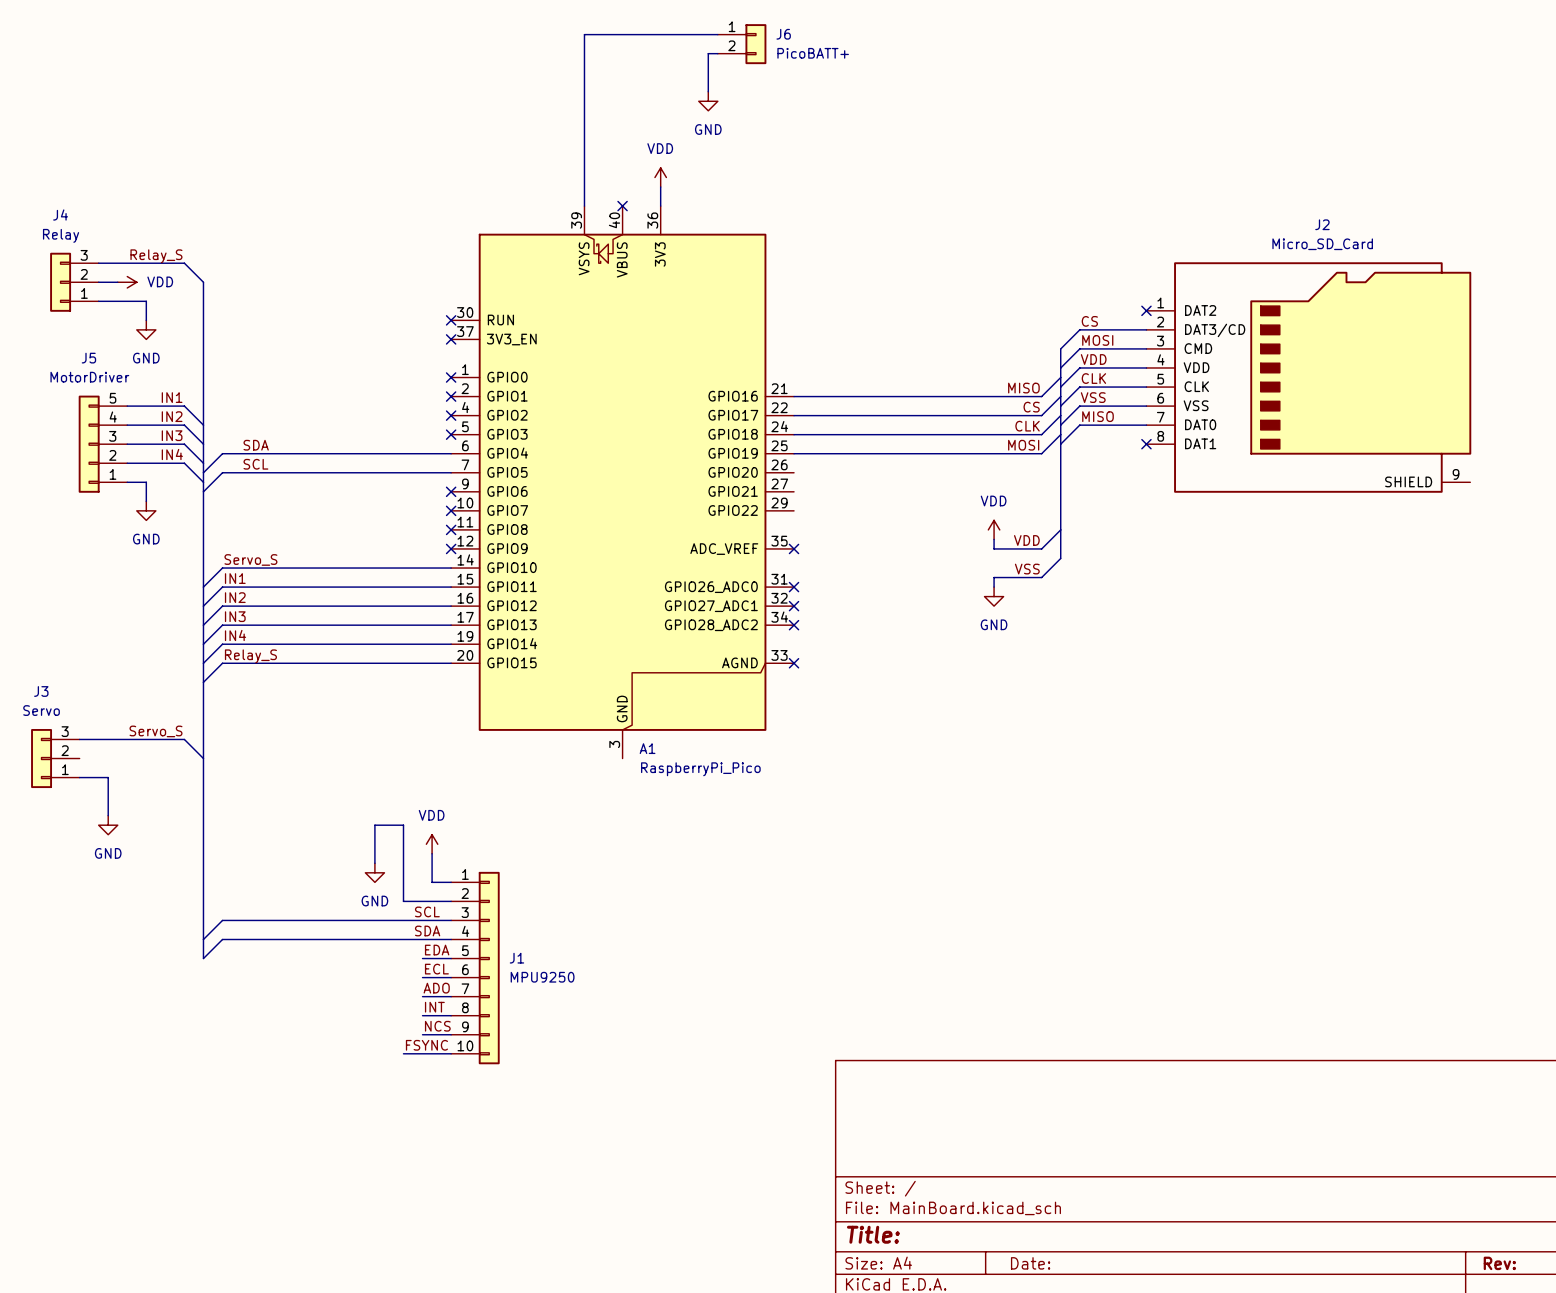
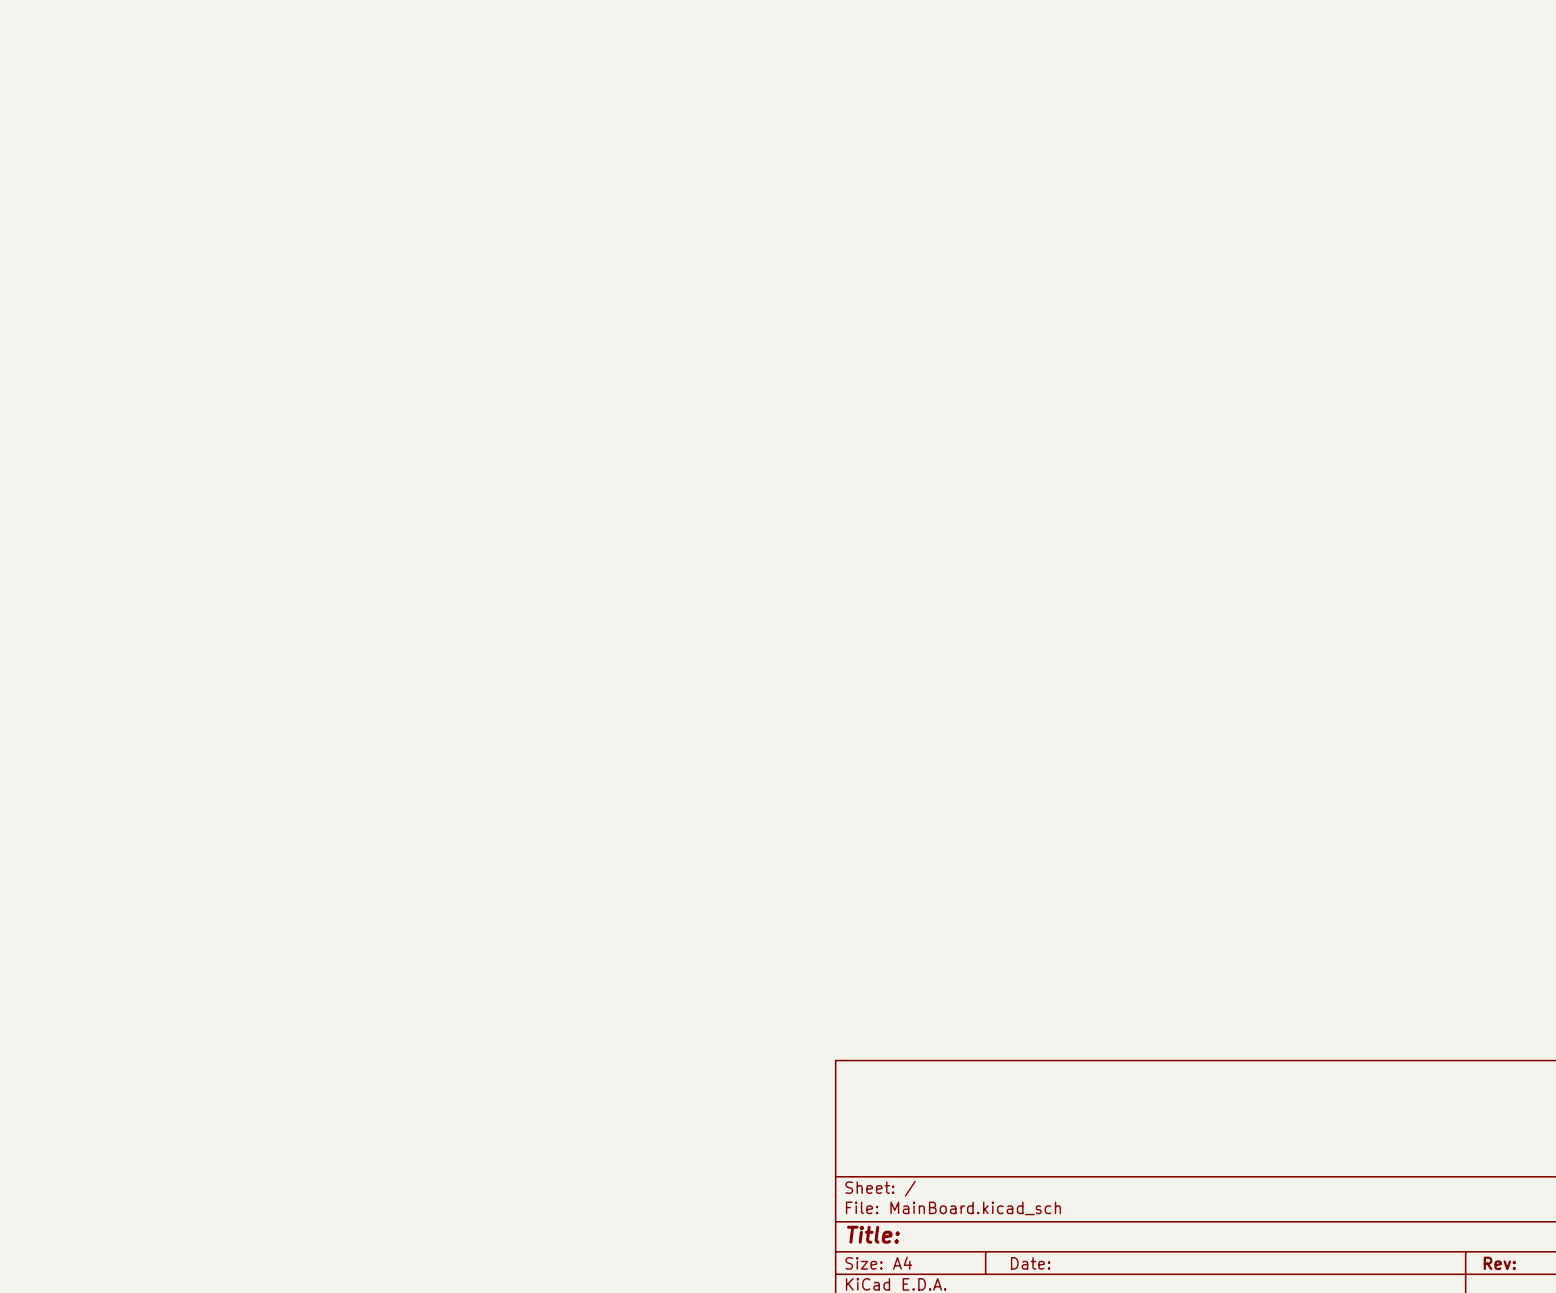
wire: (717, 34) (584, 34) (584, 206) -> none
J6: PicoBATT+ (742, 44) -> none
wire: (717, 53) (708, 53) (708, 91) -> none
power symbol: GND (708, 101) -> none
power symbol: VDD (660, 177) -> none
wire: (660, 187) (660, 206) -> none
no-connect mark: (622, 206) -> none
label: Relay_S (156, 256) -> none
wire: (98, 263) (184, 263) (203, 282) -> none
J4: Relay (74, 282) -> none
wire: (98, 282) (117, 282) -> none
power symbol: VDD (127, 282) -> none
bus: (203, 282) (203, 958) -> none
wire: (98, 301) (146, 301) (146, 320) -> none
no-connect mark: (1146, 310) -> none
no-connect mark: (451, 320) -> none
label: CS (1089, 321) -> none
power symbol: GND (146, 329) -> none
wire: (1146, 329) (1079, 329) (1060, 348) -> none
no-connect mark: (451, 339) -> none
label: MOSI (1097, 340) -> none
bus: (1060, 348) (1060, 558) -> none
wire: (1146, 348) (1079, 348) (1060, 367) -> none
label: VDD (1093, 359) -> none
wire: (1146, 367) (1079, 367) (1060, 387) -> none
no-connect mark: (451, 377) -> none
wire: (1060, 377) (1041, 396) (794, 396) -> none
J2: Micro_SD_Card (1308, 377) -> none
label: CLK (1093, 378) -> none
wire: (1146, 387) (1079, 387) (1060, 406) -> none
label: MISO (1023, 388) -> none
no-connect mark: (451, 396) -> none
wire: (1060, 396) (1041, 415) (794, 415) -> none
label: IN1 (172, 397) -> none
label: VSS (1093, 397) -> none
wire: (127, 406) (184, 406) (203, 425) -> none
wire: (1146, 406) (1079, 406) (1060, 425) -> none
label: CS (1031, 407) -> none
no-connect mark: (451, 415) -> none
wire: (1060, 415) (1041, 434) (794, 434) -> none
label: IN2 (172, 416) -> none
label: MISO (1097, 416) -> none
wire: (127, 425) (184, 425) (203, 444) -> none
wire: (1146, 425) (1079, 425) (1060, 444) -> none
label: CLK (1027, 426) -> none
no-connect mark: (451, 434) -> none
wire: (1060, 434) (1041, 453) (794, 453) -> none
label: IN3 (172, 435) -> none
J5: MotorDriver (102, 444) -> none
wire: (127, 444) (184, 444) (203, 463) -> none
no-connect mark: (1146, 444) -> none
label: SDA (256, 445) -> none
label: MOSI (1023, 445) -> none
wire: (451, 453) (222, 453) (203, 472) -> none
label: IN4 (172, 454) -> none
wire: (127, 463) (184, 463) (203, 482) -> none
label: SCL (255, 464) -> none
wire: (451, 472) (222, 472) (203, 491) -> none
wire: (127, 482) (146, 482) (146, 501) -> none
A1: RaspberryPi_Pico (622, 482) -> none
no-connect mark: (451, 491) -> none
power symbol: GND (146, 510) -> none
no-connect mark: (451, 510) -> none
no-connect mark: (451, 529) -> none
power symbol: VDD (994, 529) -> none
wire: (1060, 529) (1041, 548) (994, 548) (994, 539) -> none
label: VDD (1026, 540) -> none
no-connect mark: (451, 548) -> none
no-connect mark: (794, 548) -> none
wire: (1060, 558) (1041, 577) (994, 577) (994, 587) -> none
label: Servo_S (250, 559) -> none
wire: (451, 568) (222, 568) (203, 587) -> none
label: VSS (1027, 569) -> none
label: IN1 (235, 578) -> none
wire: (451, 587) (222, 587) (203, 606) -> none
no-connect mark: (794, 587) -> none
power symbol: GND (994, 596) -> none
label: IN2 (235, 597) -> none
wire: (451, 606) (222, 606) (203, 625) -> none
no-connect mark: (794, 606) -> none
label: IN3 (235, 616) -> none
wire: (451, 625) (222, 625) (203, 644) -> none
no-connect mark: (794, 625) -> none
label: IN4 (235, 635) -> none
wire: (451, 644) (222, 644) (203, 663) -> none
label: Relay_S (250, 656) -> none
wire: (451, 663) (222, 663) (203, 682) -> none
no-connect mark: (794, 663) -> none
label: Servo_S (156, 731) -> none
wire: (79, 739) (184, 739) (203, 758) -> none
J3: Servo (55, 758) -> none
wire: (79, 777) (108, 777) (108, 815) -> none
power symbol: GND (108, 825) -> none
power symbol: VDD (432, 844) -> none
wire: (432, 853) (432, 882) (451, 882) -> none
wire: (374, 863) (374, 825) (403, 825) (403, 901) (451, 901) -> none
power symbol: GND (374, 872) -> none
label: SCL (427, 911) -> none
wire: (451, 920) (222, 920) (203, 939) -> none
label: SDA (427, 930) -> none
wire: (451, 939) (222, 939) (203, 958) -> none
label: EDA (437, 950) -> none
wire: (422, 958) (451, 958) -> none
J1: MPU9250 (475, 968) -> none
label: ECL (436, 969) -> none
wire: (422, 977) (451, 977) -> none
label: ADO (436, 988) -> none
wire: (422, 996) (451, 996) -> none
label: INT (434, 1007) -> none
wire: (422, 1015) (451, 1015) -> none
label: NCS (437, 1026) -> none
wire: (422, 1034) (451, 1034) -> none
label: FSYNC (426, 1045) -> none
wire: (403, 1053) (451, 1053) -> none

